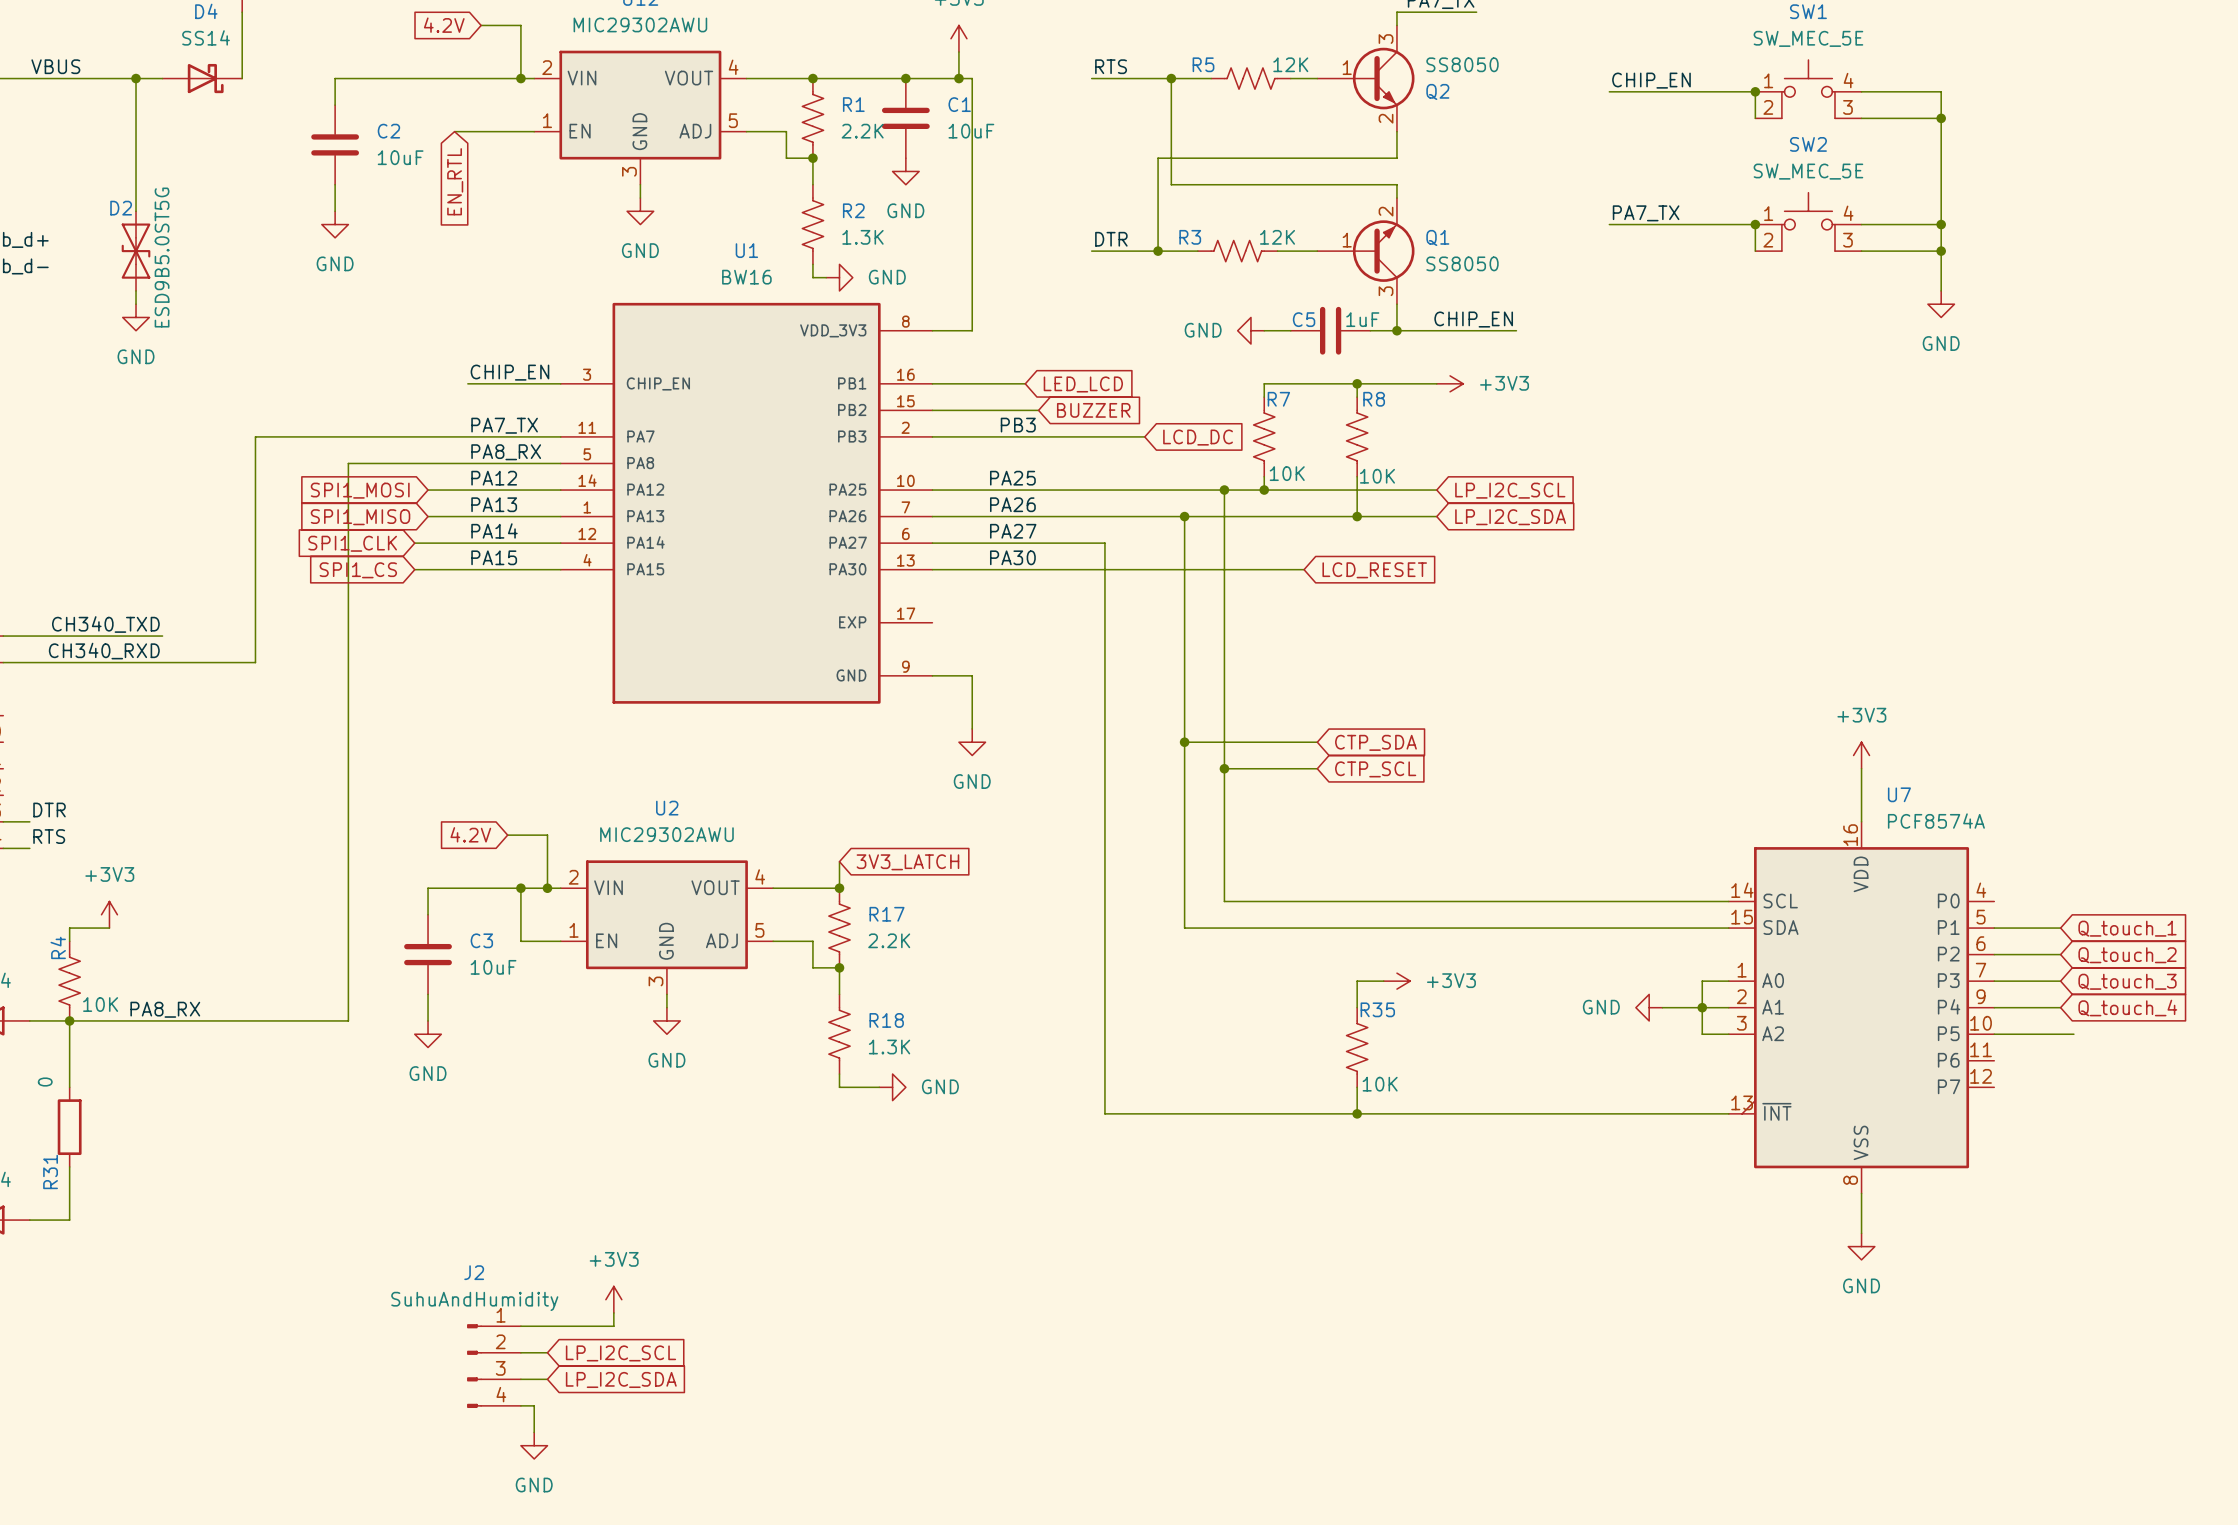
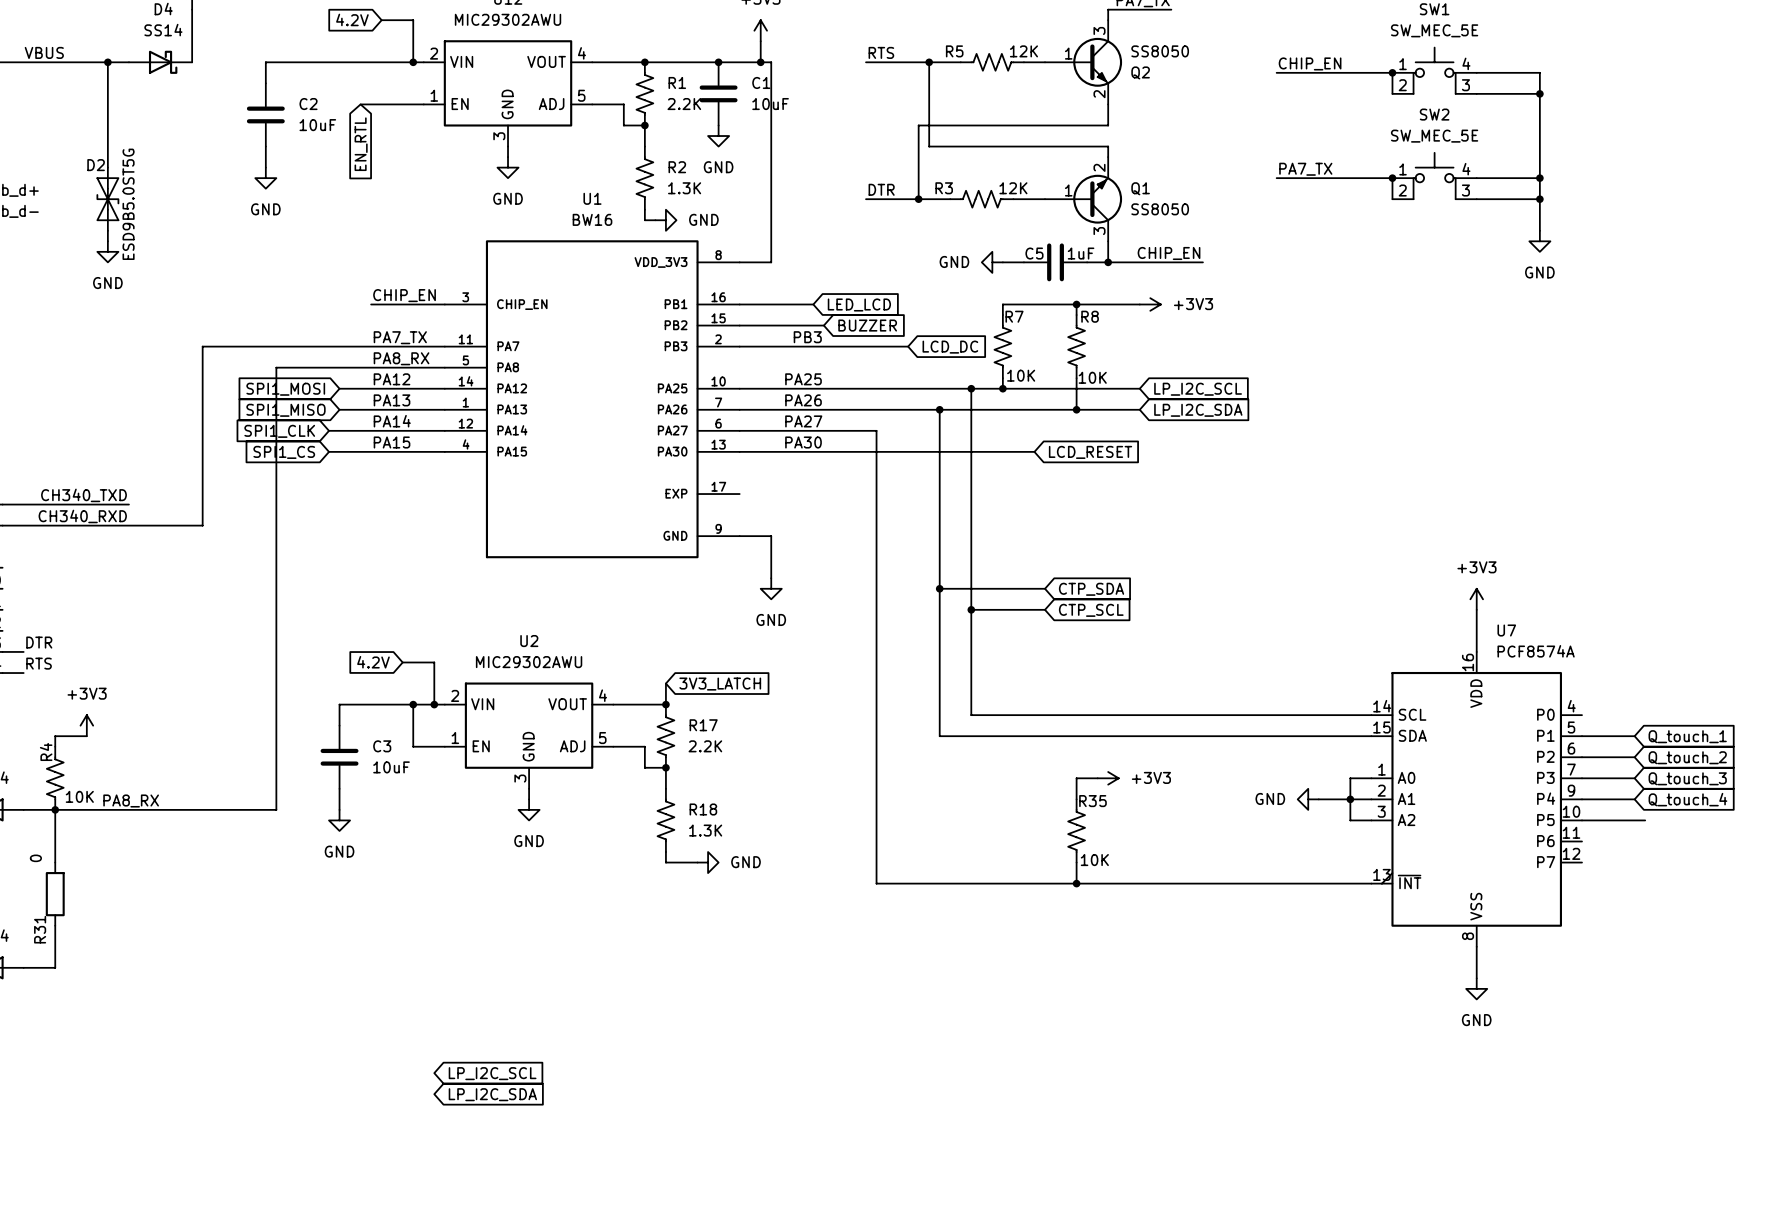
power symbol: +3V3 (613, 1299) -> none
wire: (613, 1312) (613, 1326) (520, 1326) -> none
wire: (520, 1352) (547, 1352) -> none
J2: SuhuAndHumidity (493, 1366) -> none
wire: (520, 1379) (547, 1379) -> none
wire: (520, 1405) (534, 1405) (534, 1432) -> none
power symbol: GND (534, 1445) -> none

